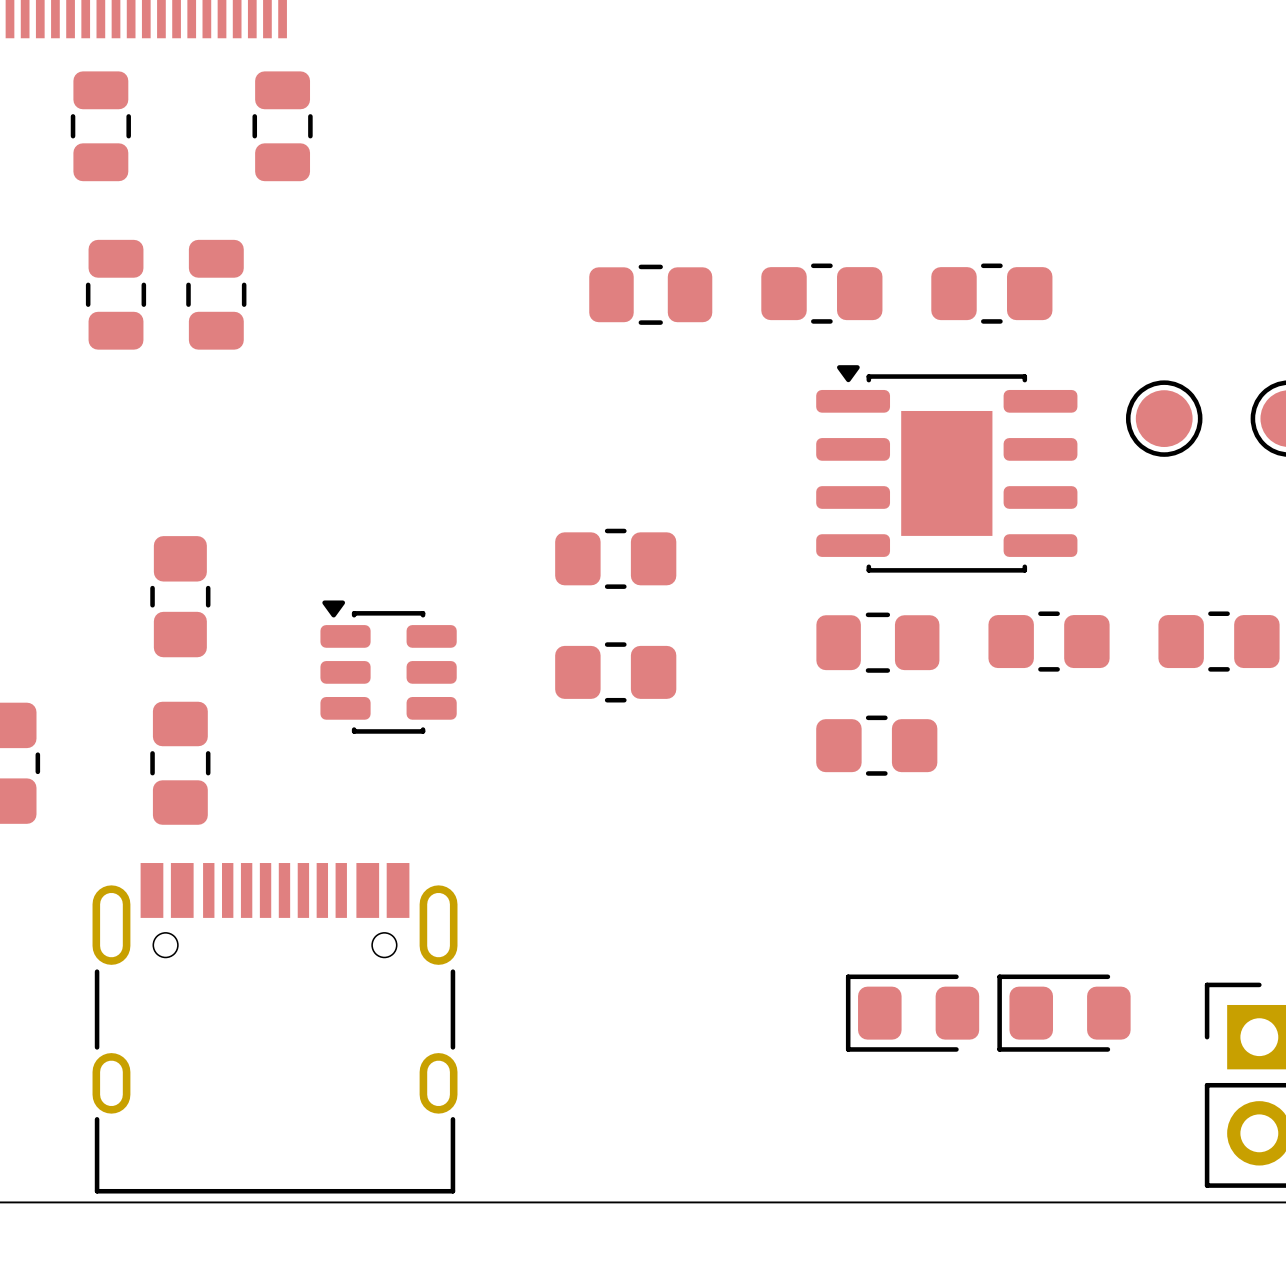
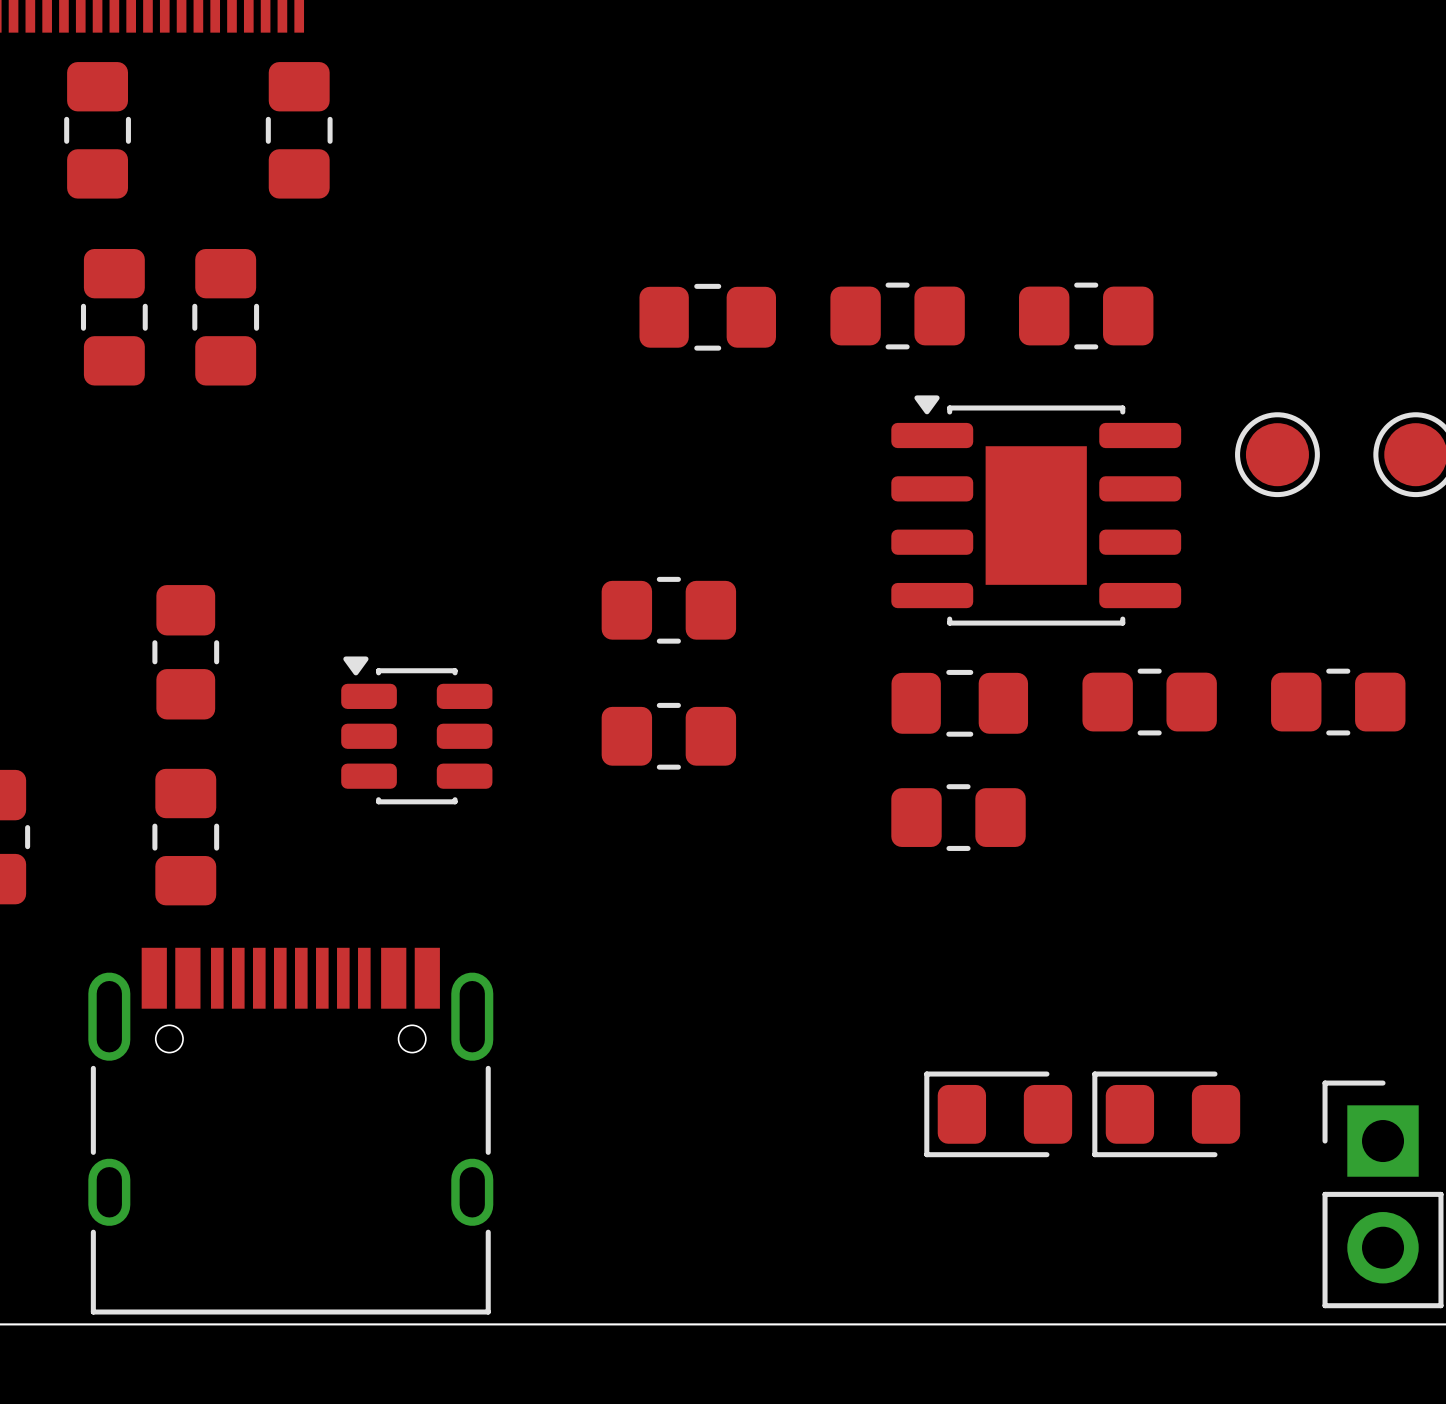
part footprint: [70, 71, 131, 182] -> [64, 62, 131, 199]
part footprint: [252, 71, 313, 182] -> [265, 62, 333, 199]
part footprint: [85, 239, 147, 350] -> [80, 248, 148, 386]
part footprint: [186, 239, 247, 350] -> [192, 248, 260, 386]

